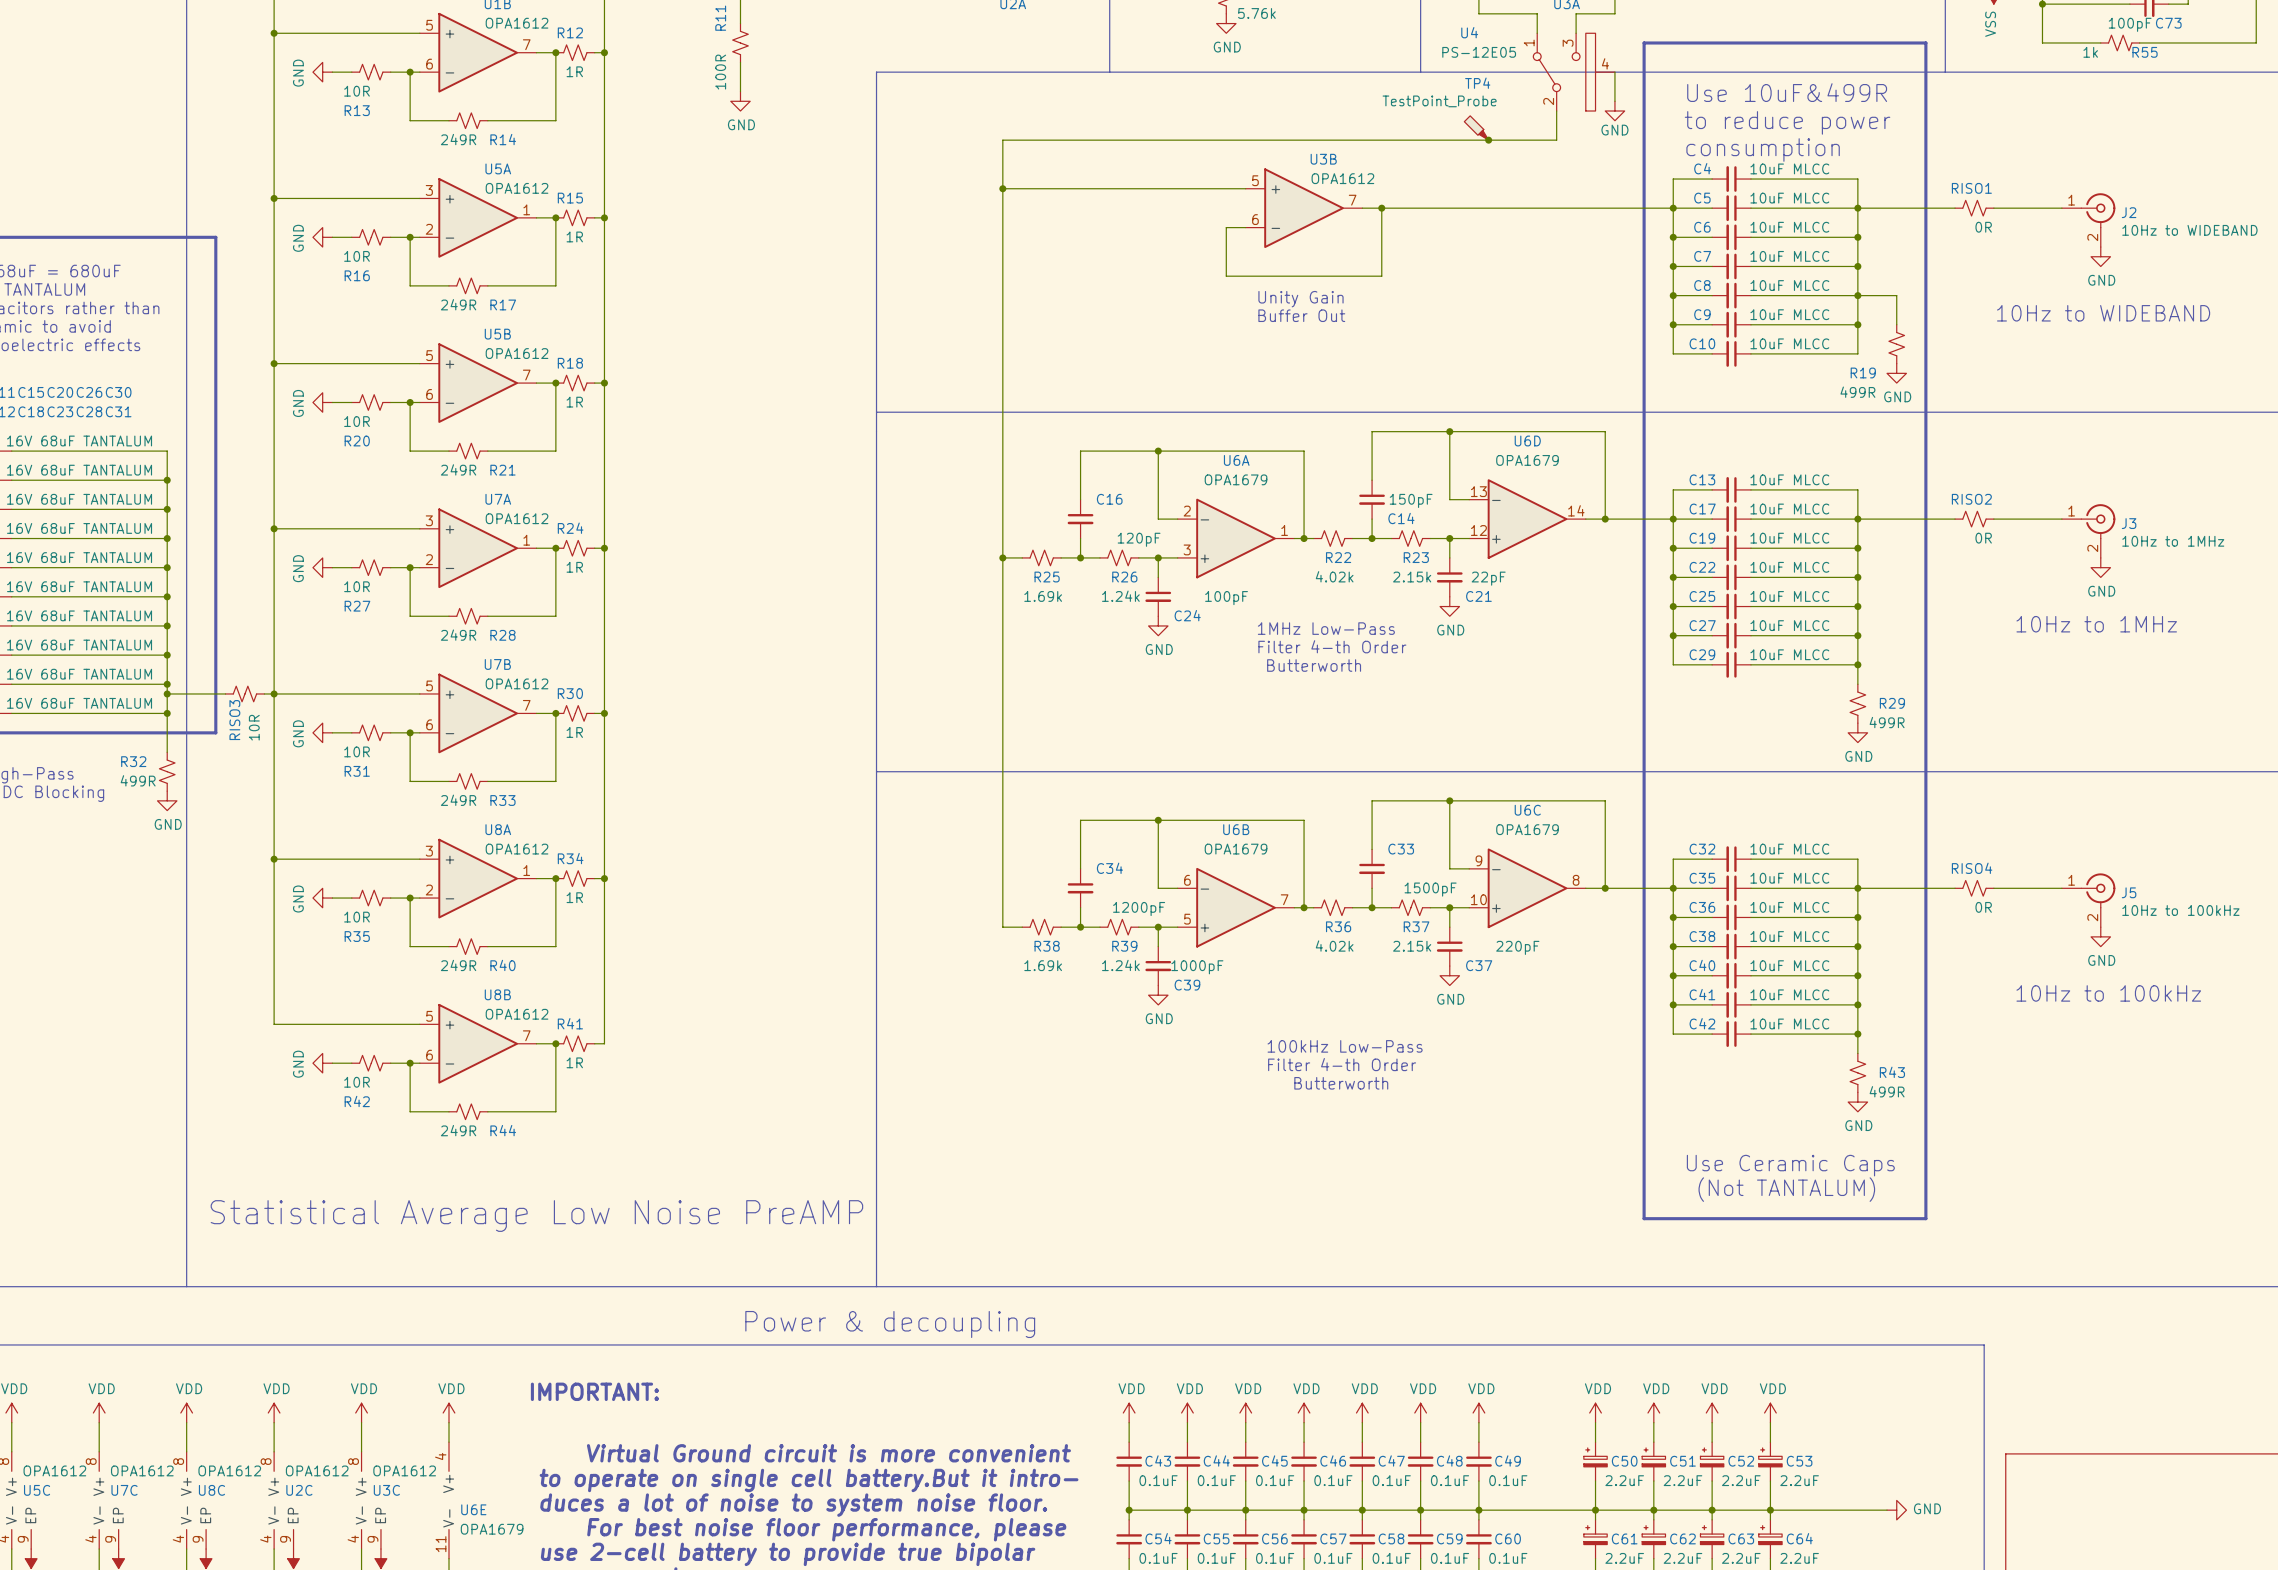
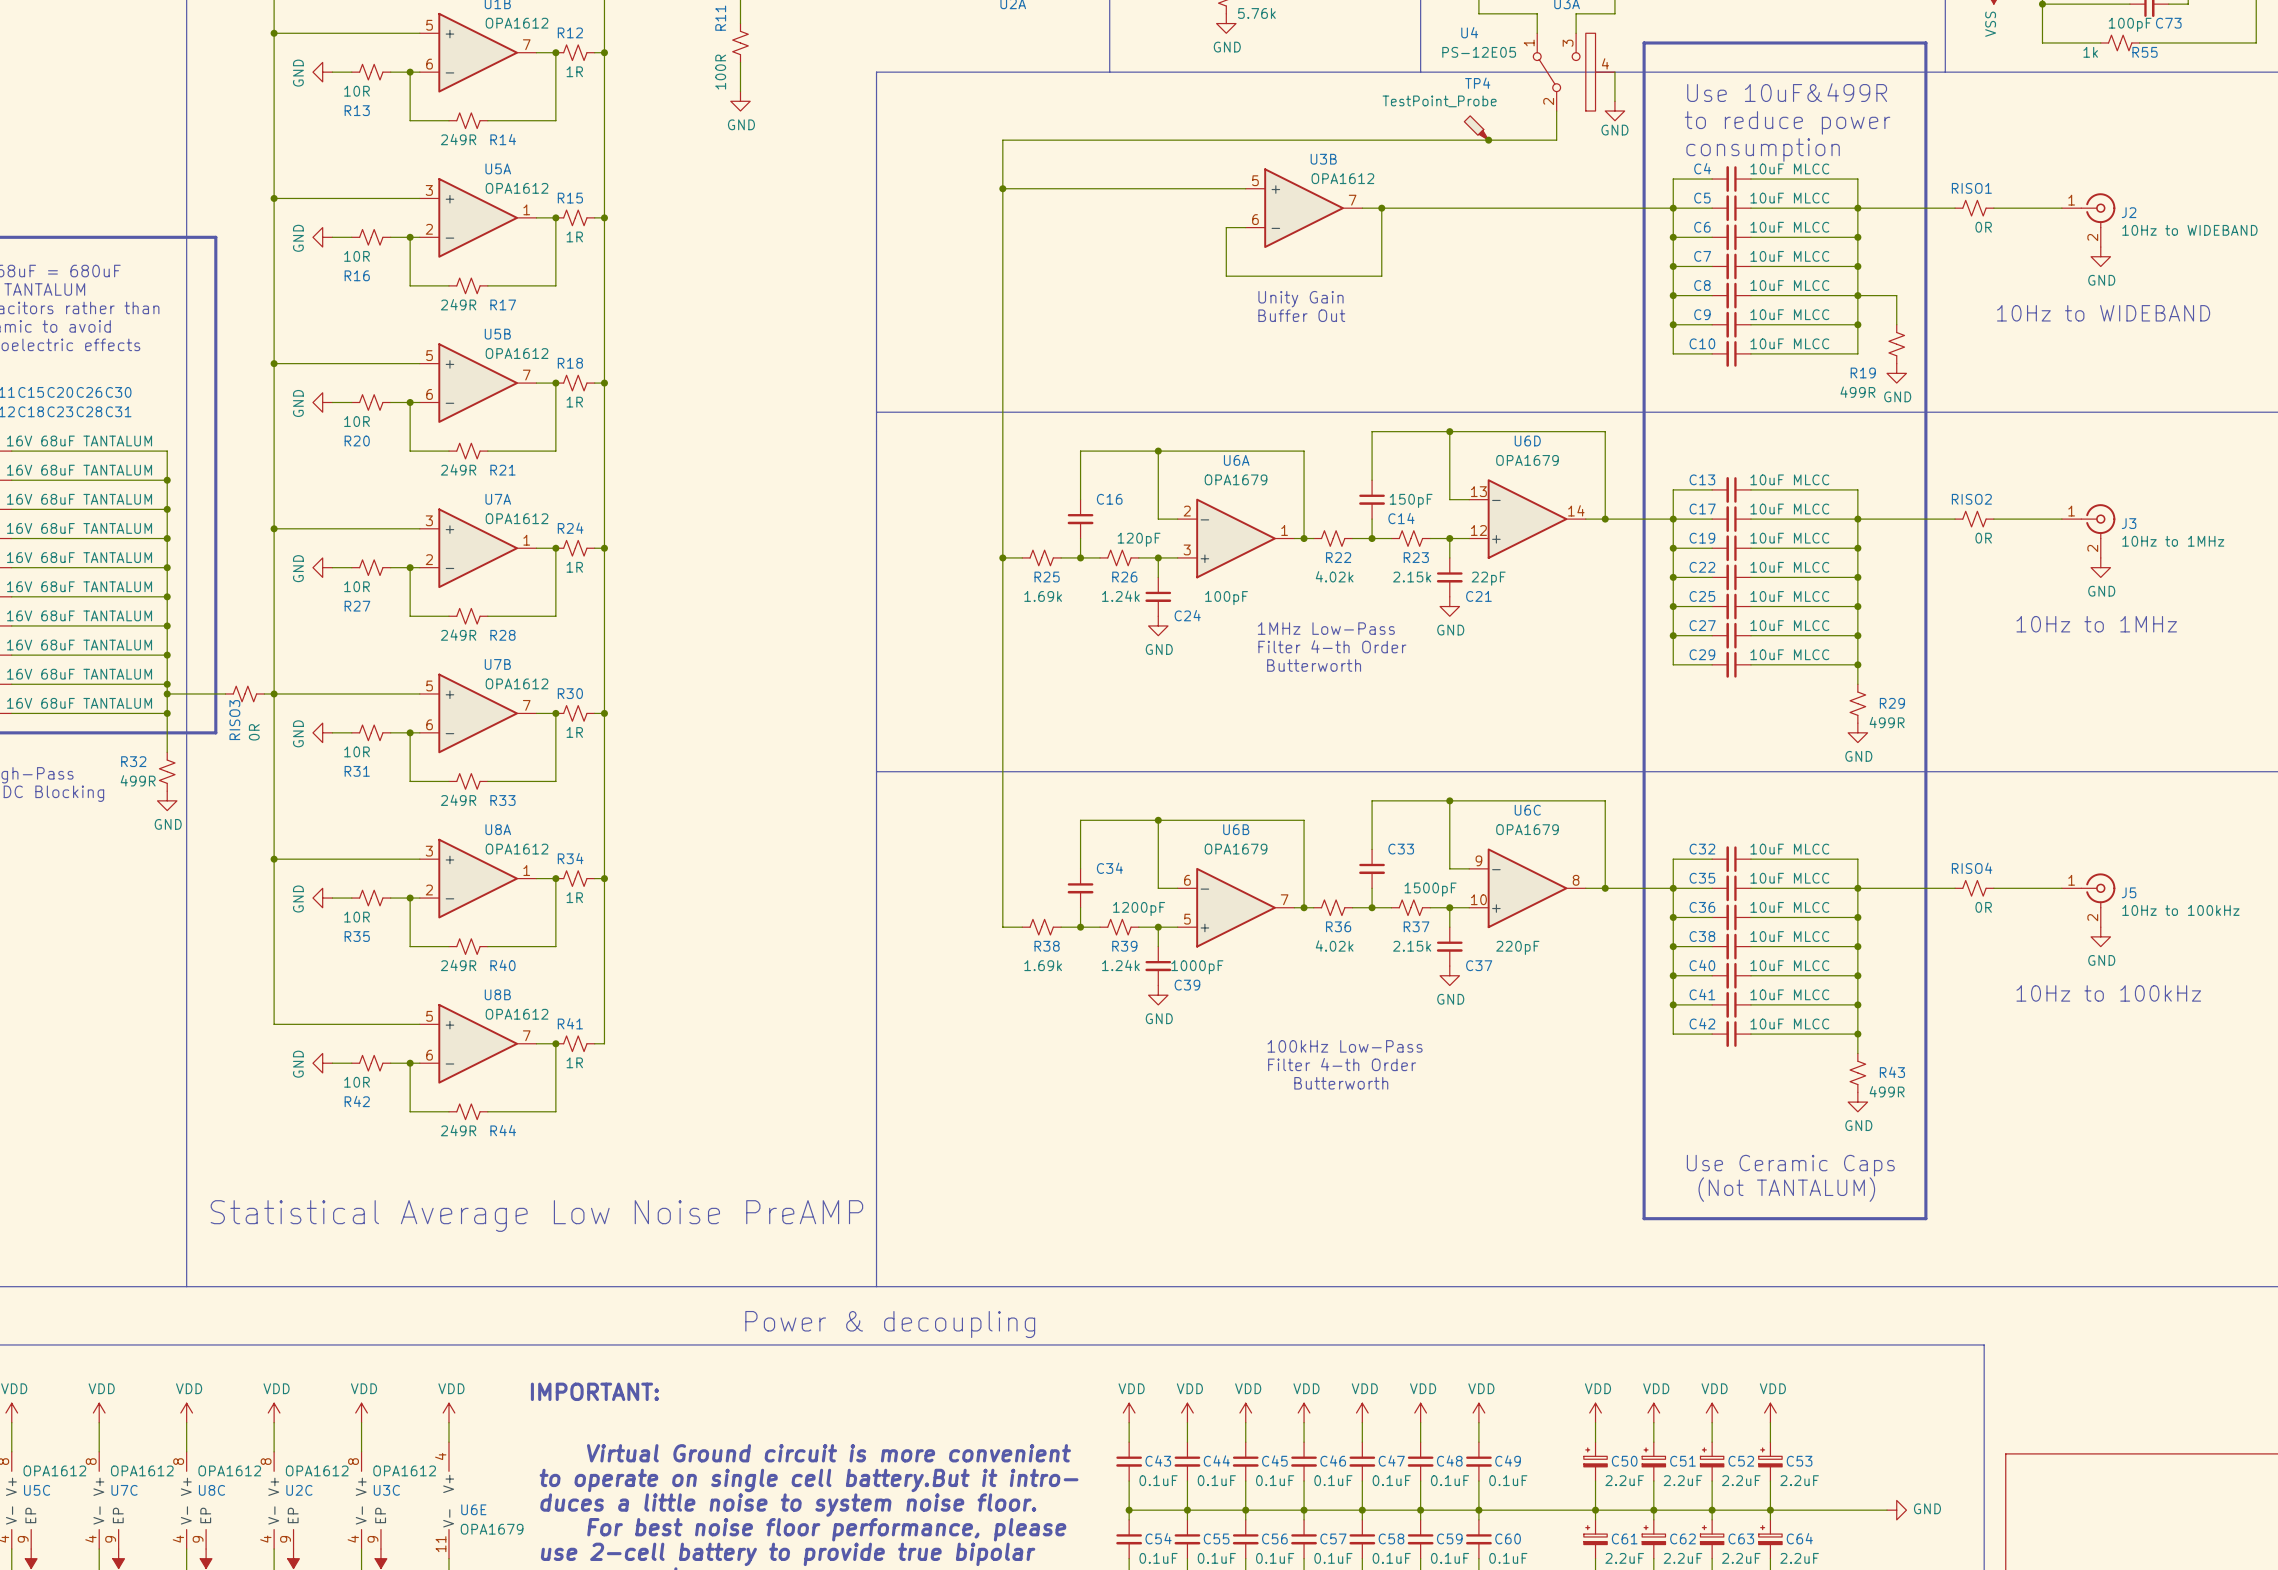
RISO3 value: 10R (254, 727) -> 0R (254, 732)
text: duces a lot of noise to system noise floor. (793, 1505) -> duces a little noise to system noise floor. (788, 1505)

